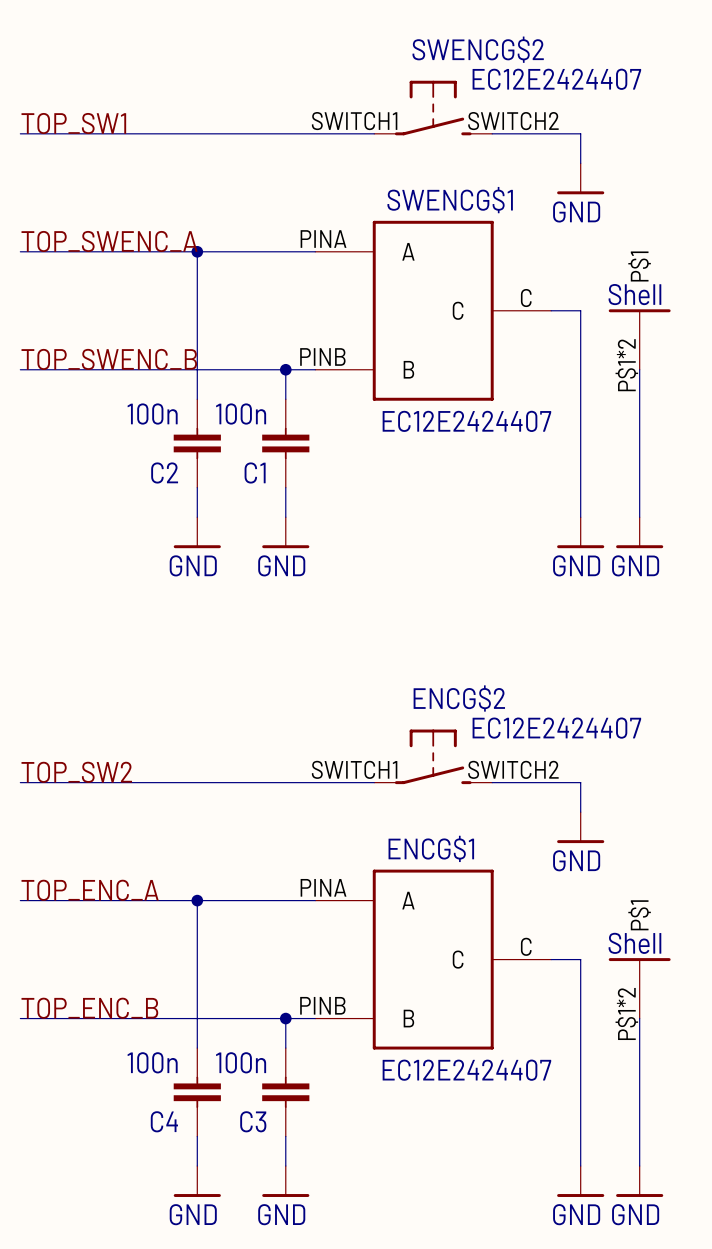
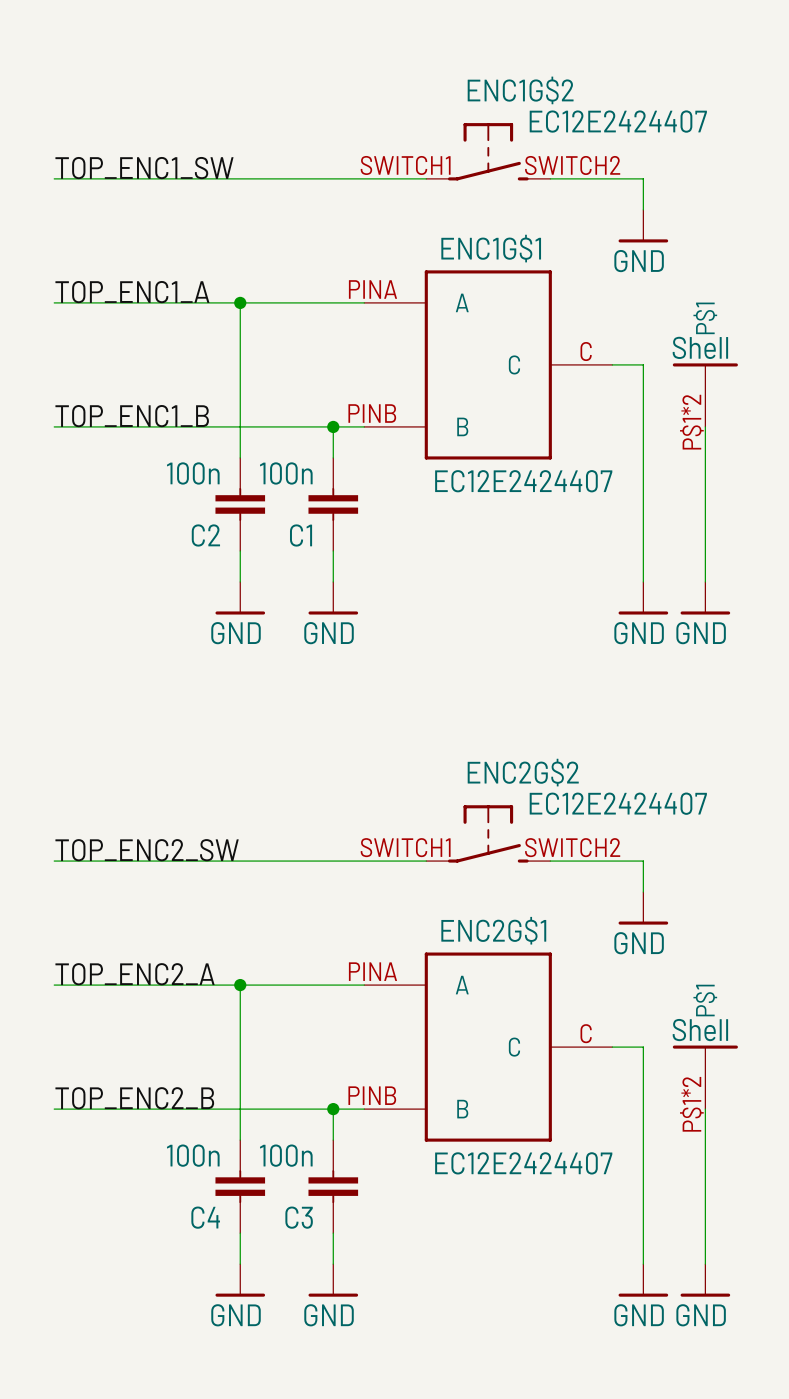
SWENCG$2 name: SWENCG$2 (478, 49) -> ENC1G$2 (520, 90)
label: TOP_SW1 (73, 123) -> TOP_ENC1_SW (144, 168)
SWENCG$1 name: SWENCG$1 (450, 200) -> ENC1G$1 (491, 248)
label: TOP_SWENC_A (109, 241) -> TOP_ENC1_A (132, 292)
label: TOP_SWENC_B (109, 359) -> TOP_ENC1_B (132, 416)
ENCG$2 name: ENCG$2 (459, 698) -> ENC2G$2 (523, 772)
label: TOP_SW2 (76, 772) -> TOP_ENC2_SW (147, 850)
ENCG$1 name: ENCG$1 (431, 848) -> ENC2G$1 (493, 930)
label: TOP_ENC_A (90, 890) -> TOP_ENC2_A (135, 974)
label: TOP_ENC_B (89, 1008) -> TOP_ENC2_B (134, 1098)

